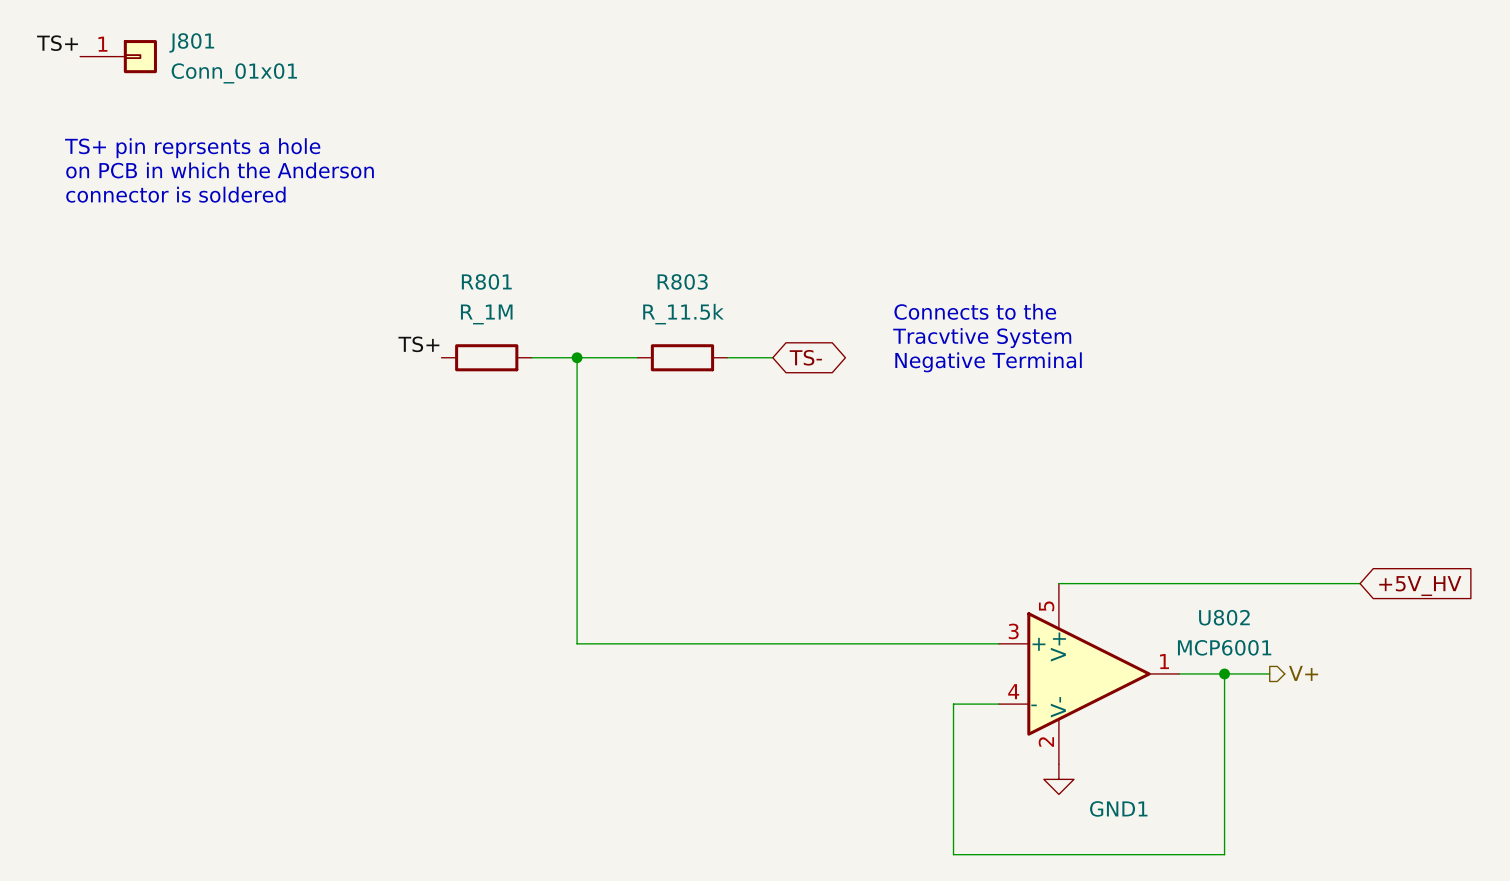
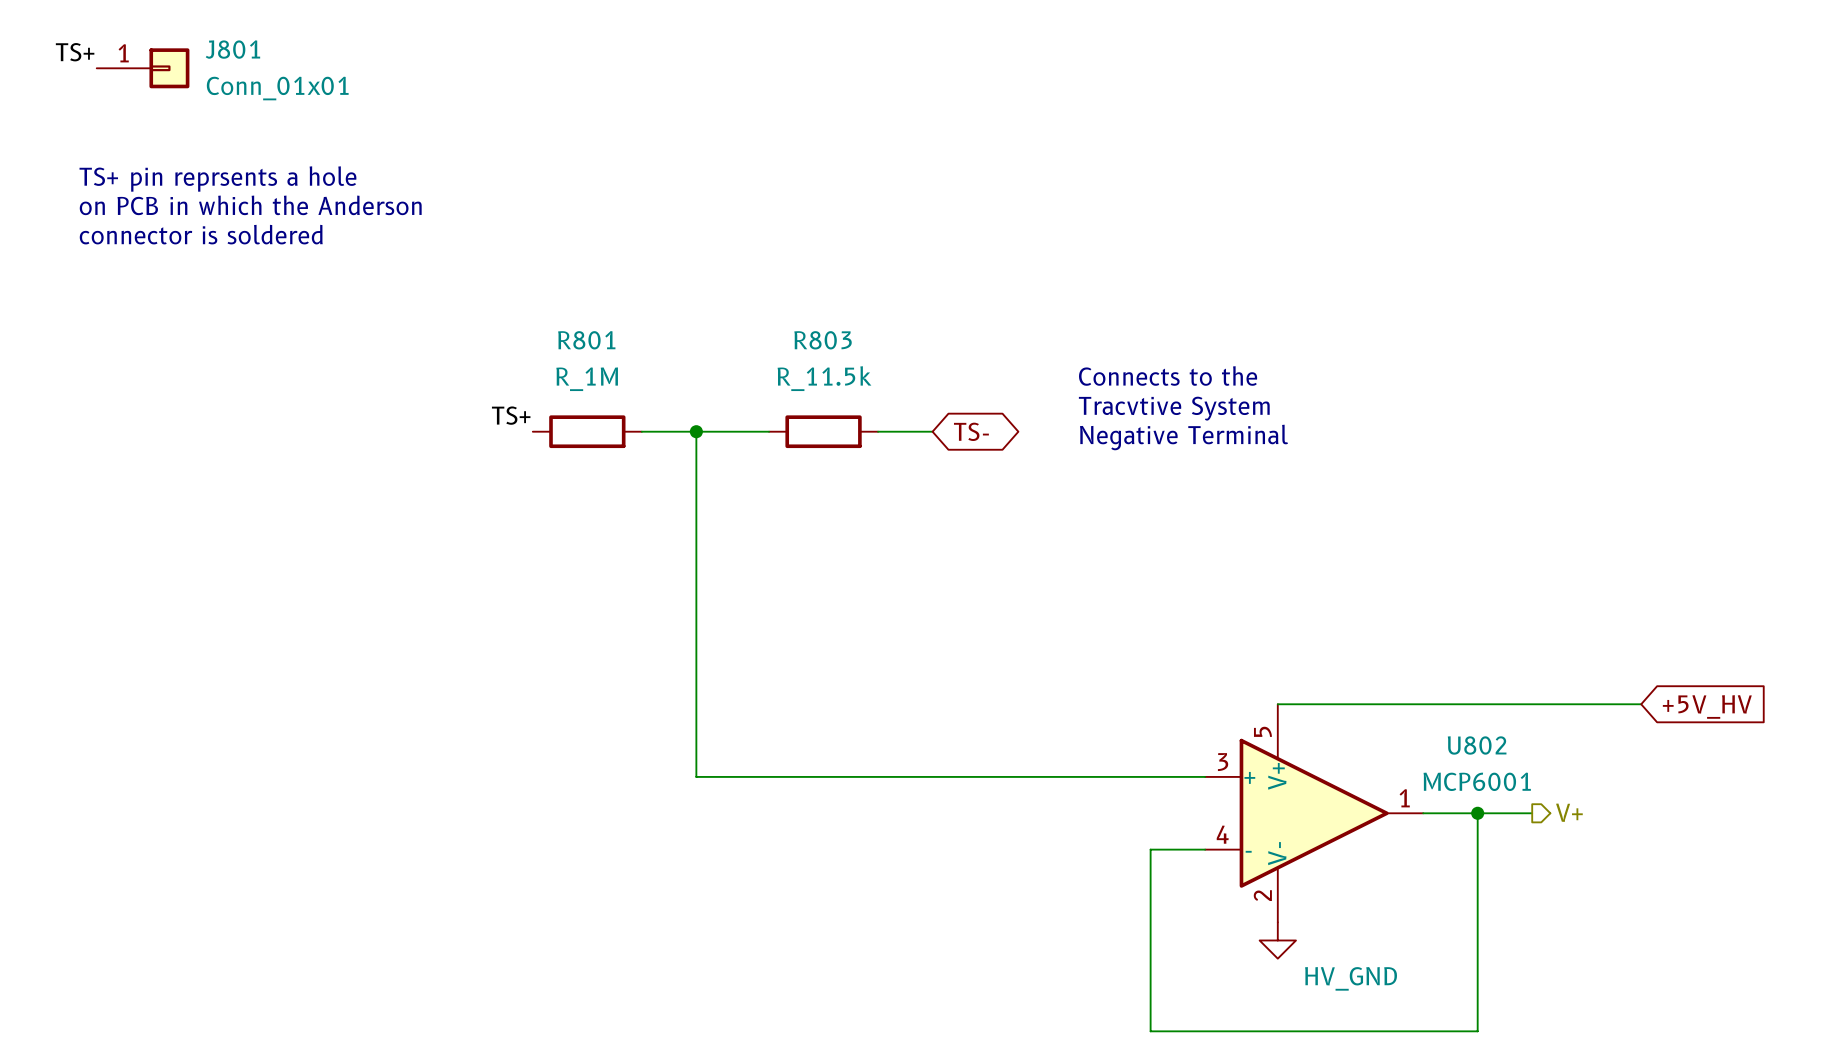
power symbol: GND1 (1058, 779) -> HV_GND (1277, 940)

